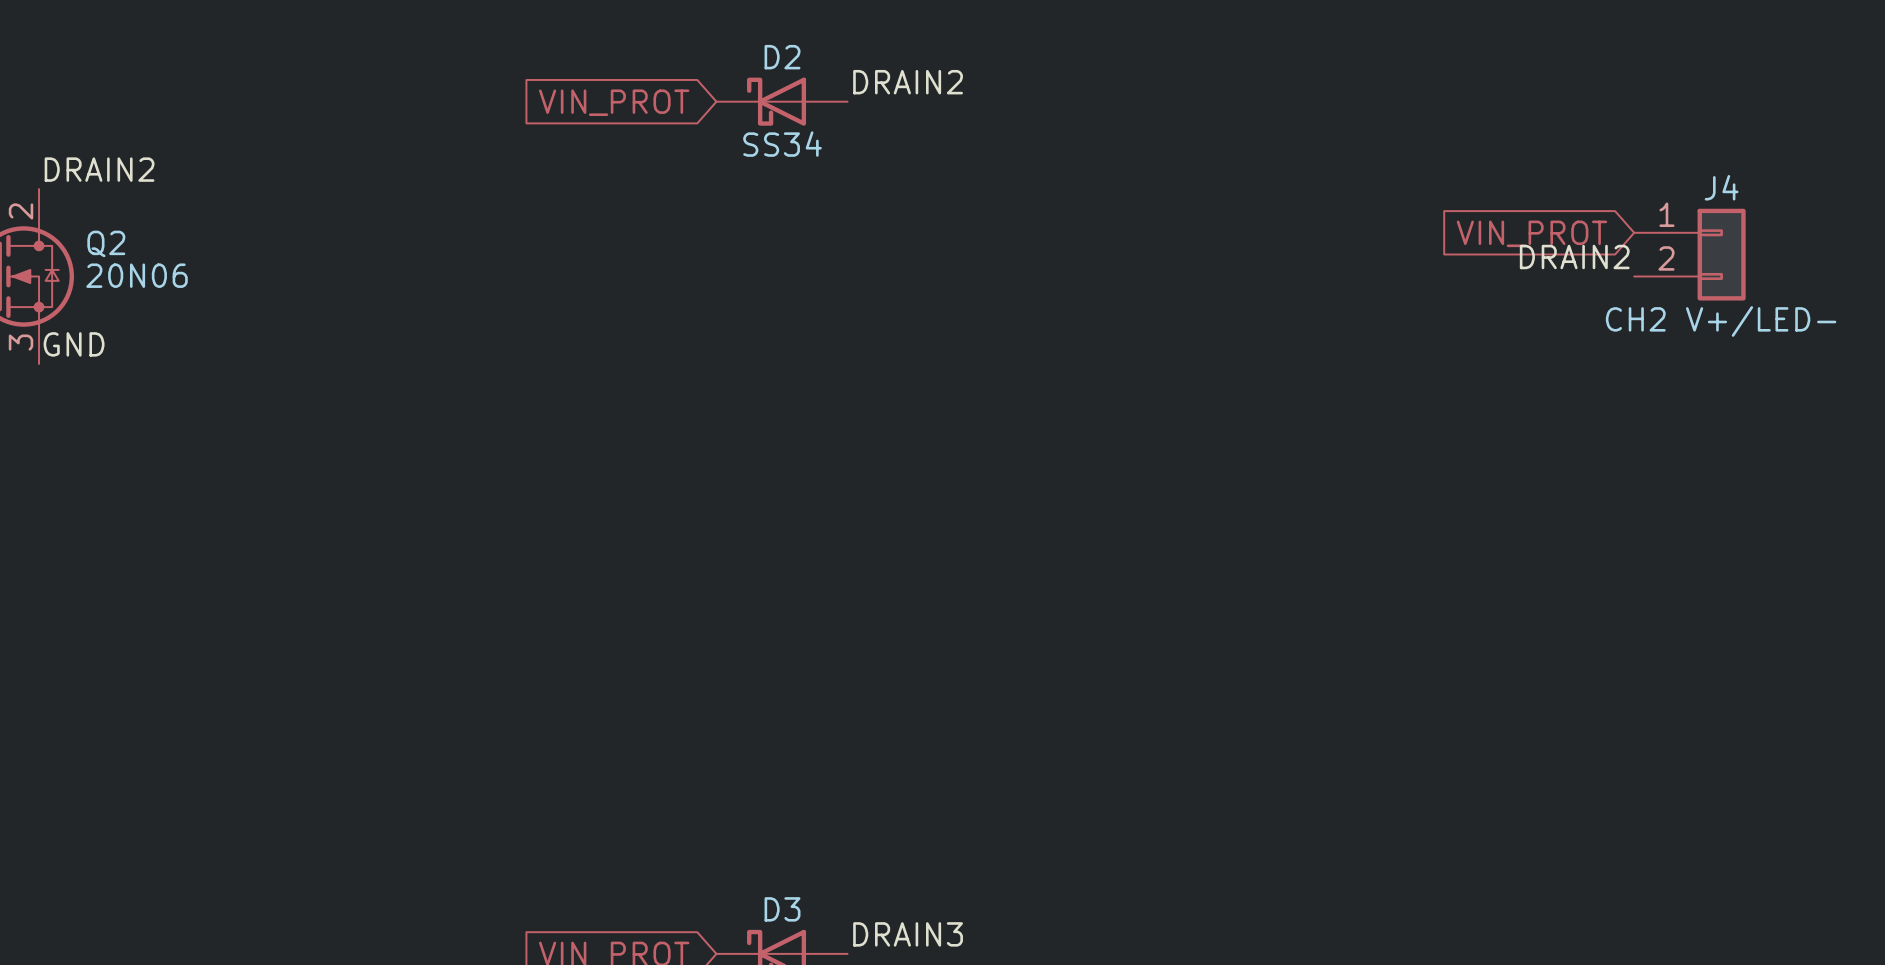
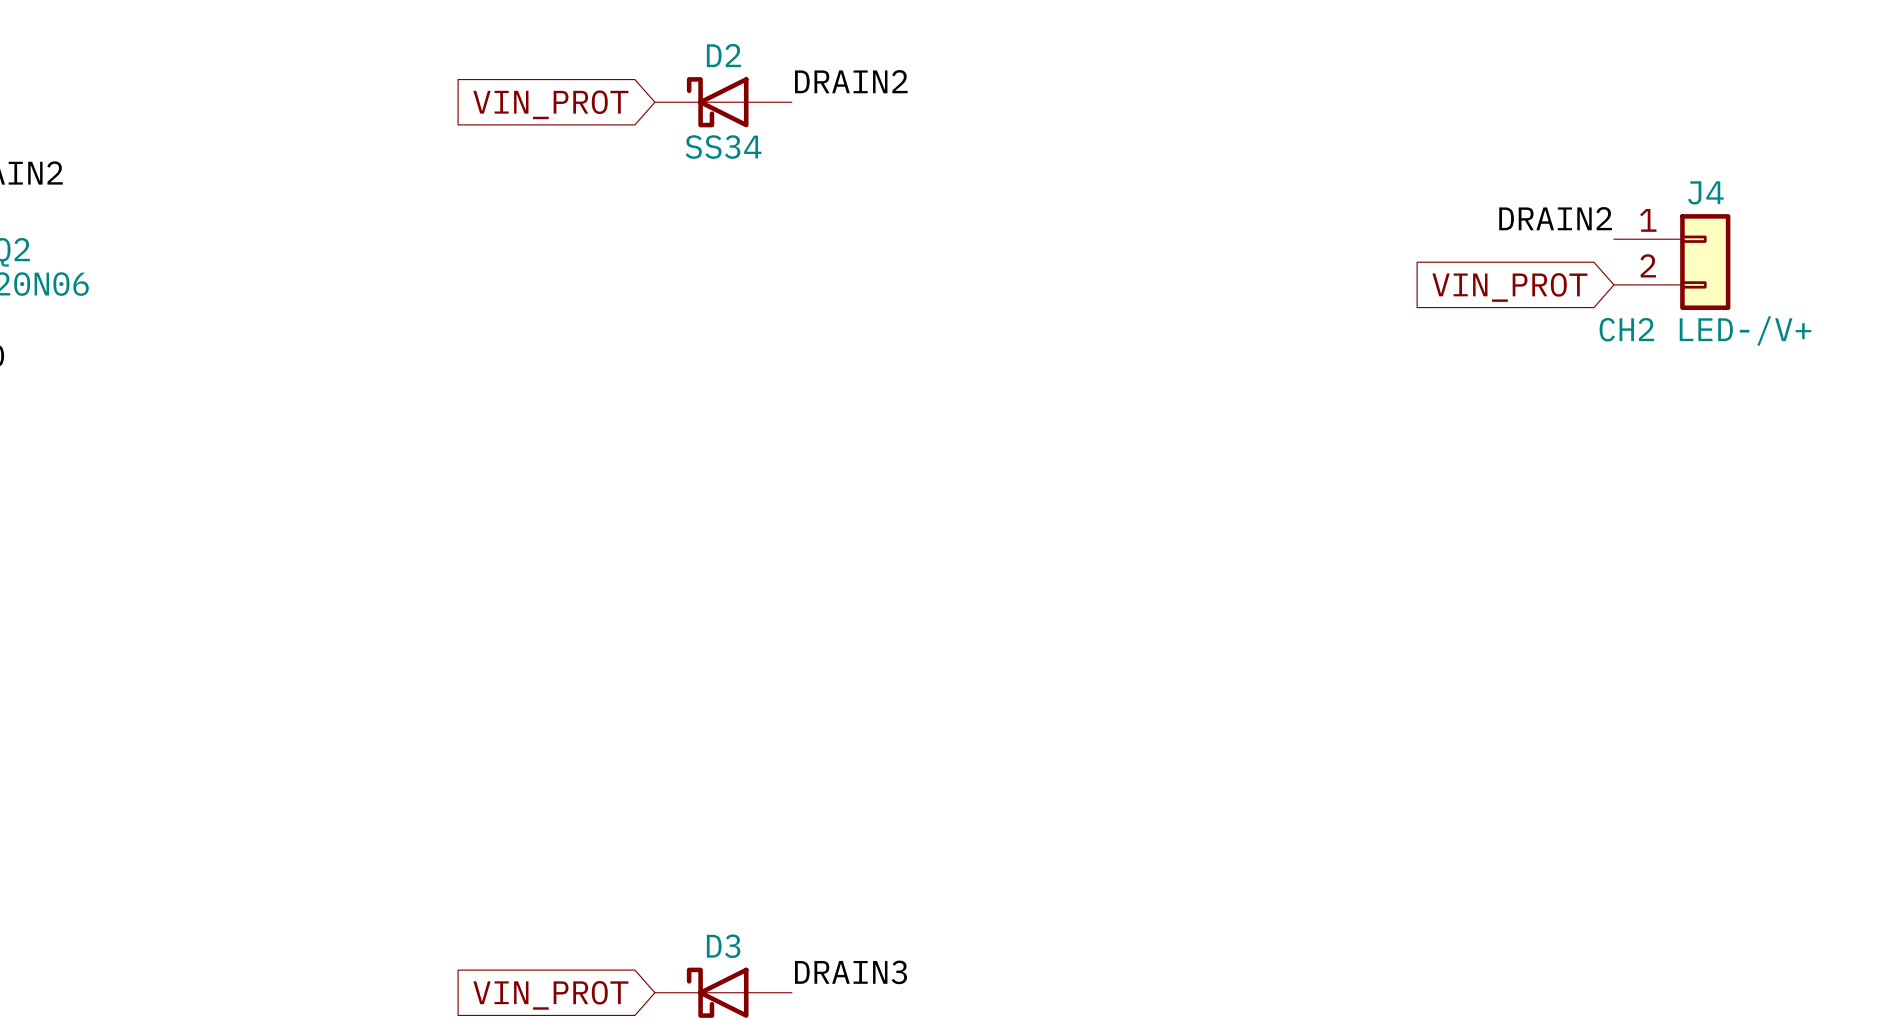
global label position: VIN_PROT (1531, 233) -> VIN_PROT (1509, 287)
label position: DRAIN2 (1574, 257) -> DRAIN2 (1555, 218)
J4 value: CH2 V+/LED- (1721, 321) -> CH2 LED-/V+ (1705, 330)

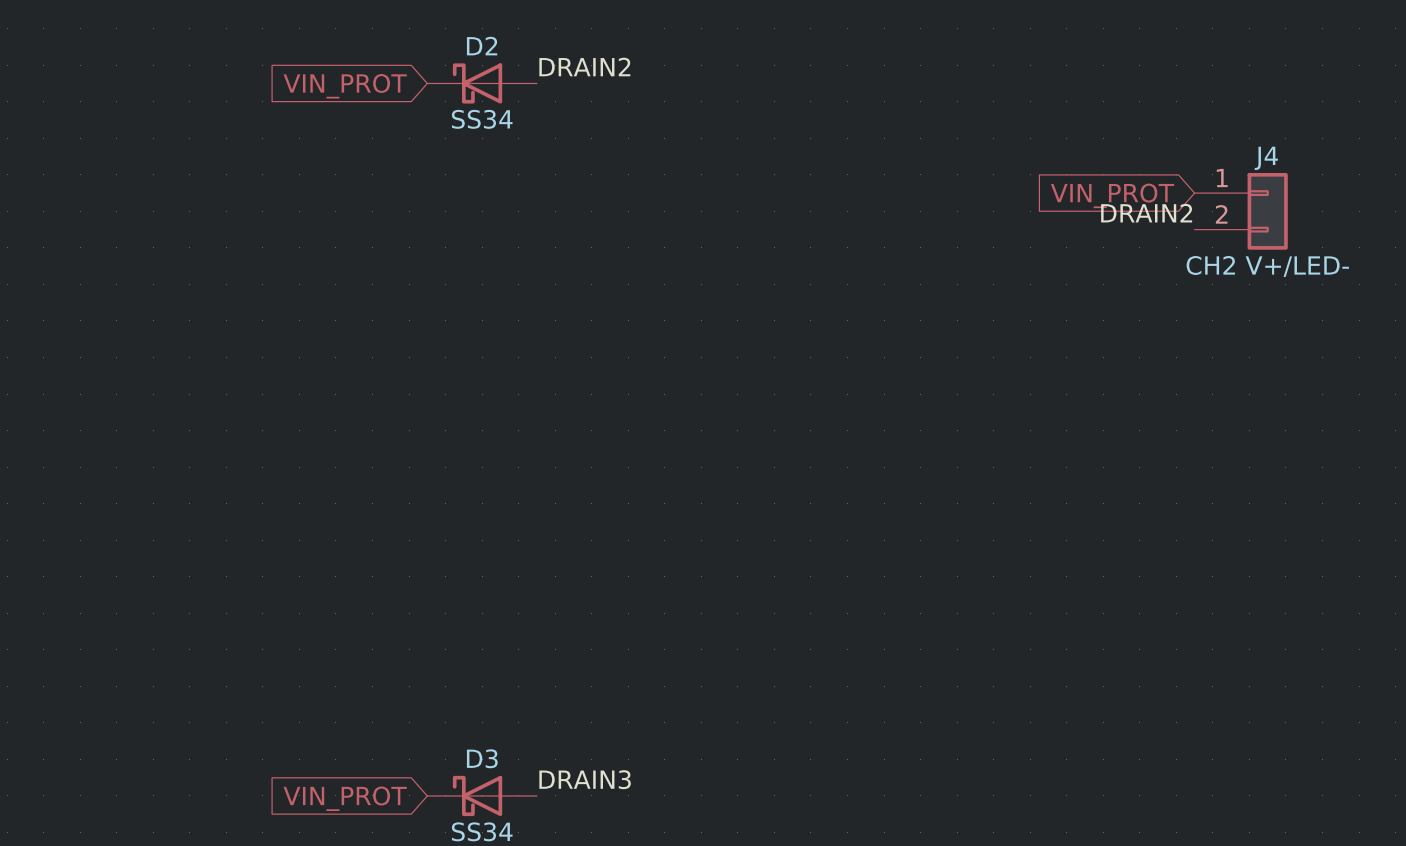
label position: DRAIN2 (1555, 218) -> DRAIN2 (1146, 213)
global label position: VIN_PROT (1509, 287) -> VIN_PROT (1112, 195)
J4 value: CH2 LED-/V+ (1705, 330) -> CH2 V+/LED- (1267, 266)

